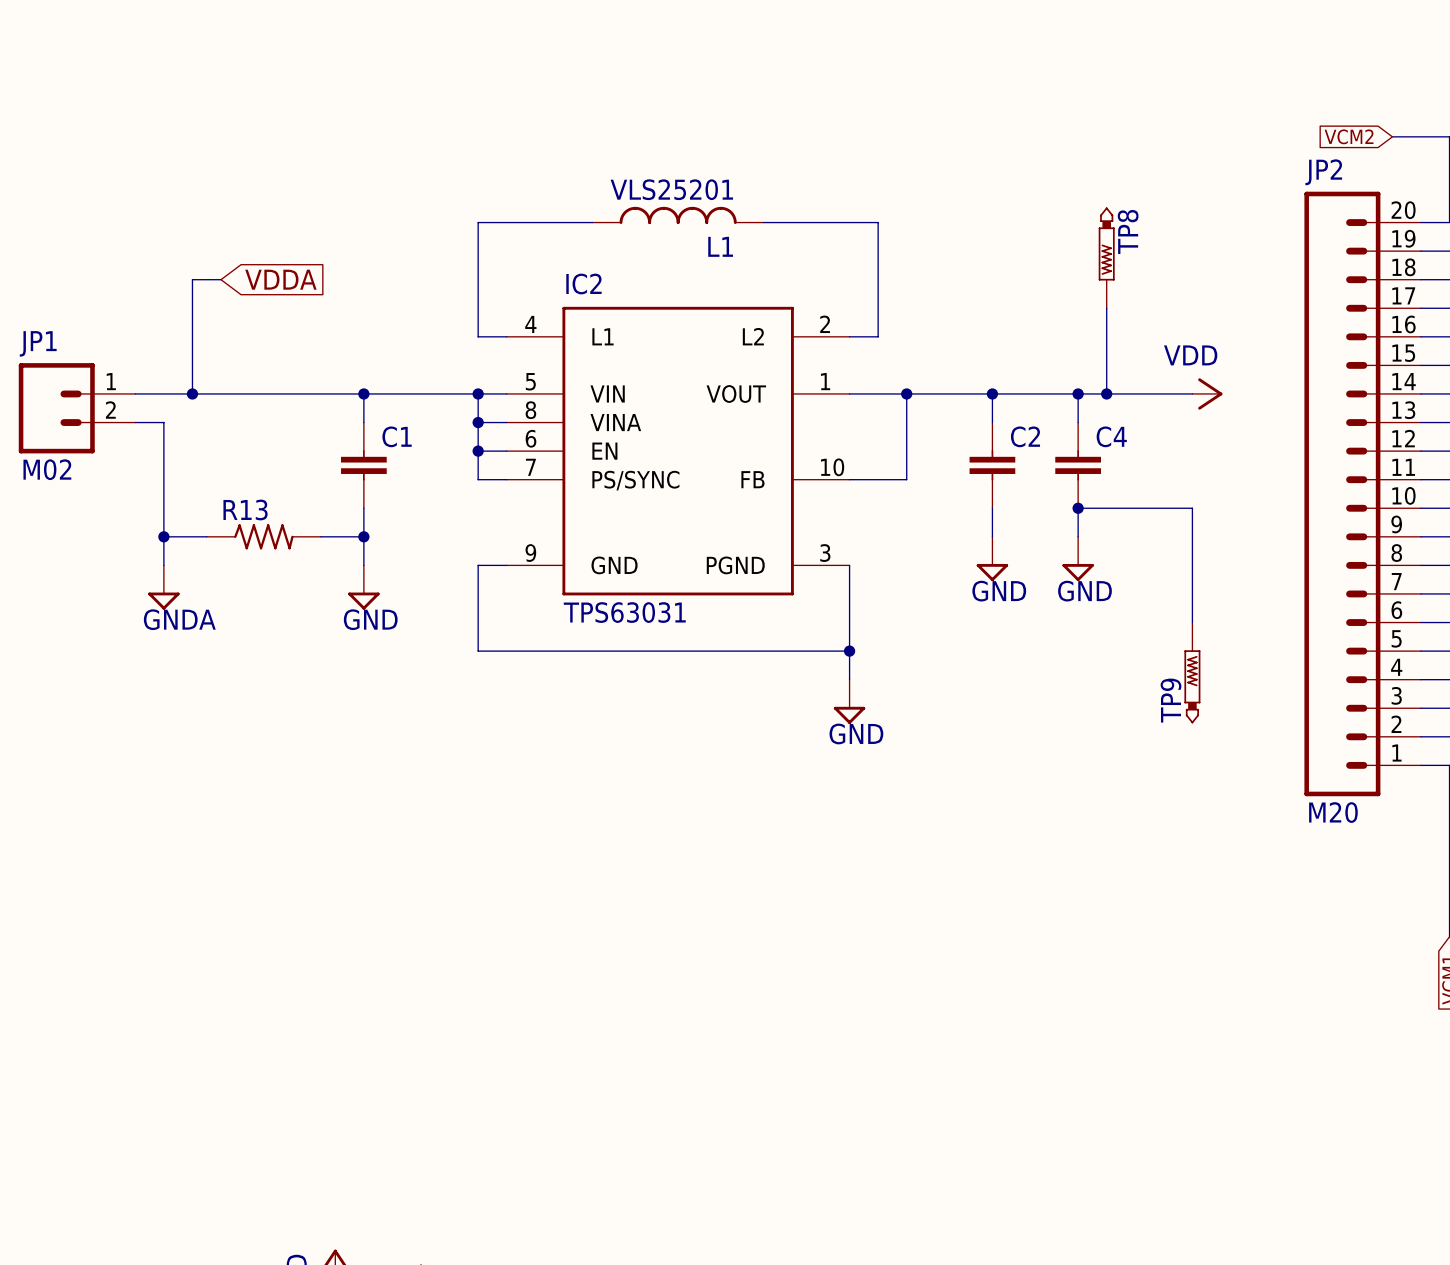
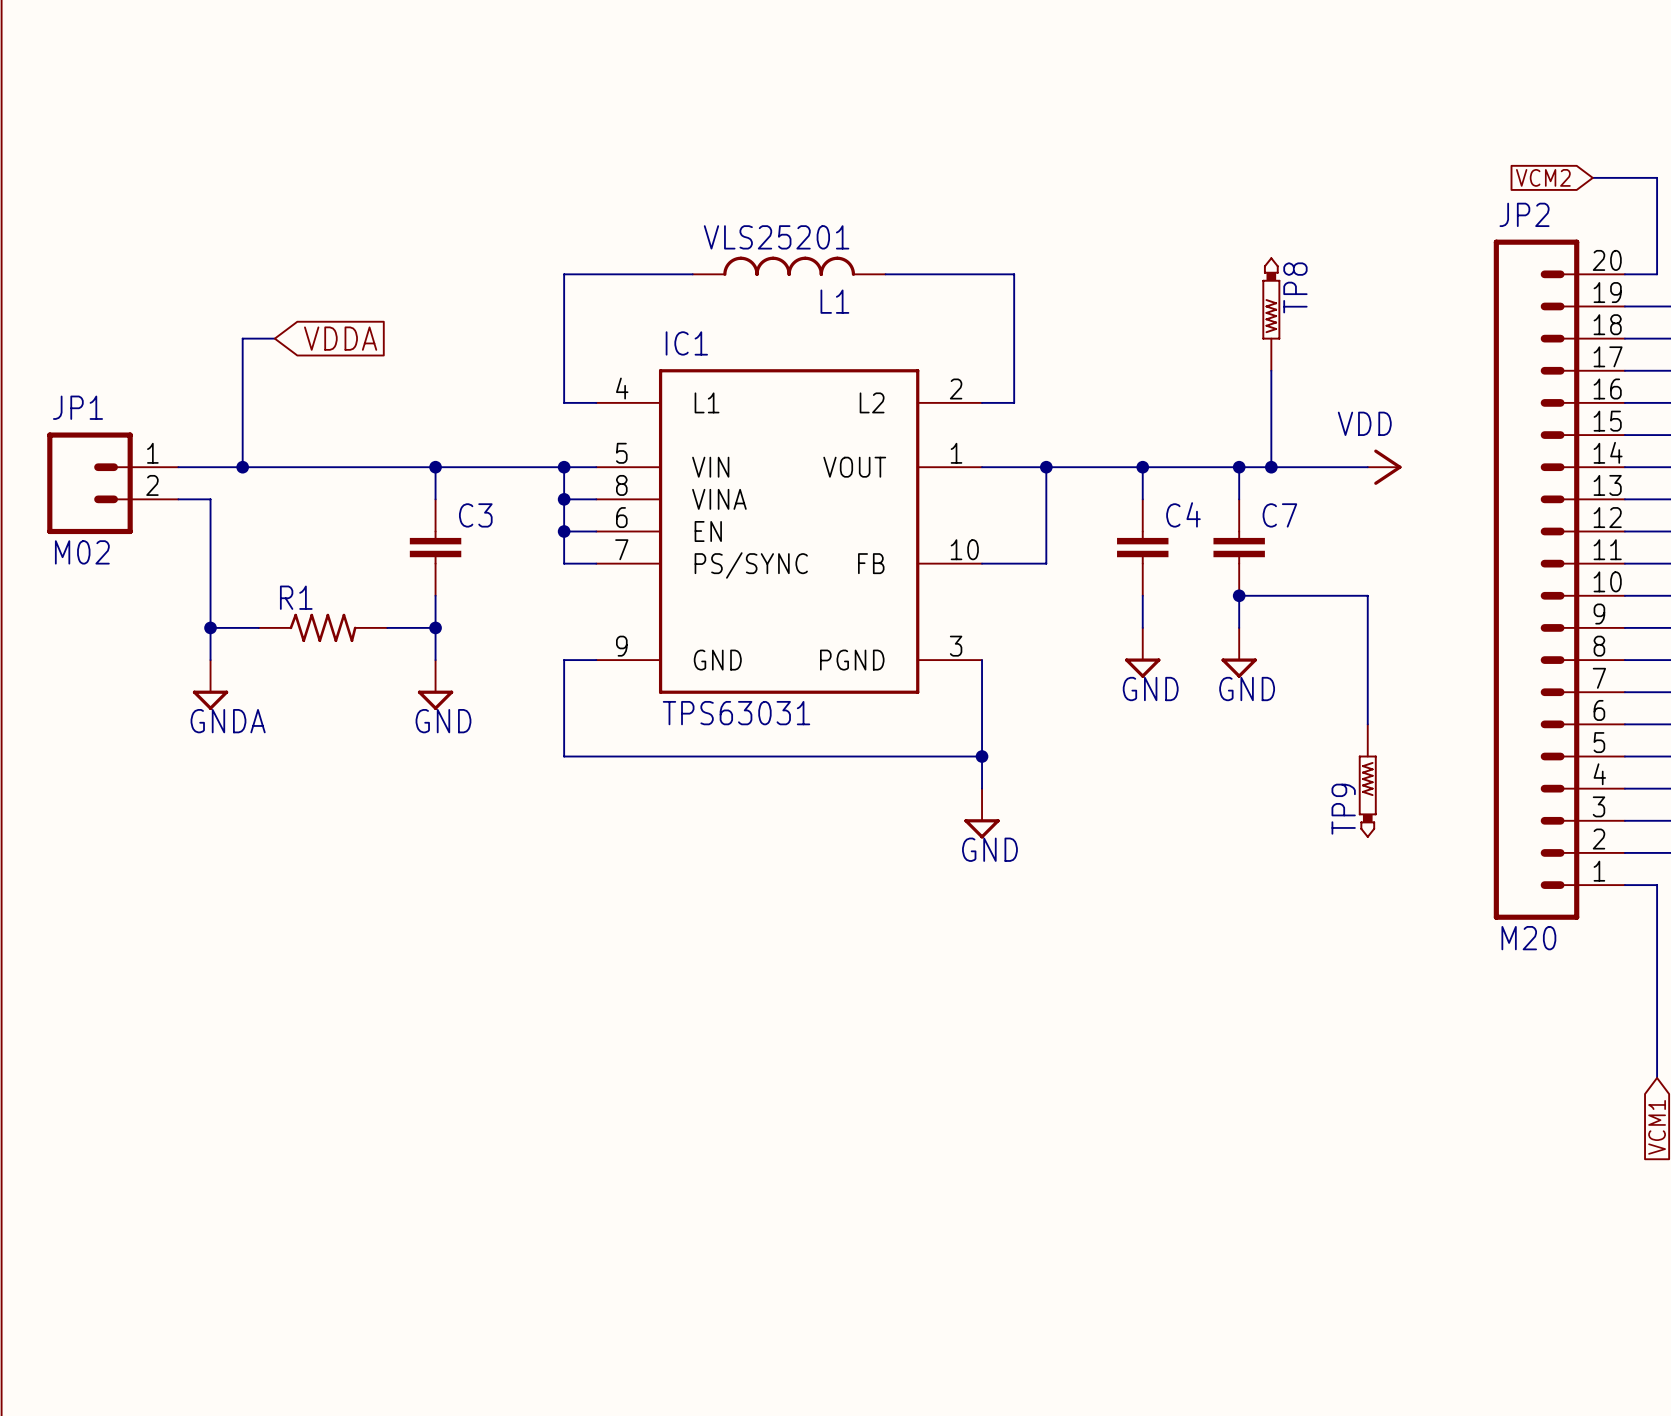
IC2 name: IC2 (583, 283) -> IC1 (686, 343)
C1 name: C1 (397, 436) -> C3 (475, 515)
C2 name: C2 (1025, 436) -> C4 (1183, 514)
C4 name: C4 (1111, 436) -> C7 (1279, 515)
R13 name: R13 (245, 509) -> R1 (296, 597)

